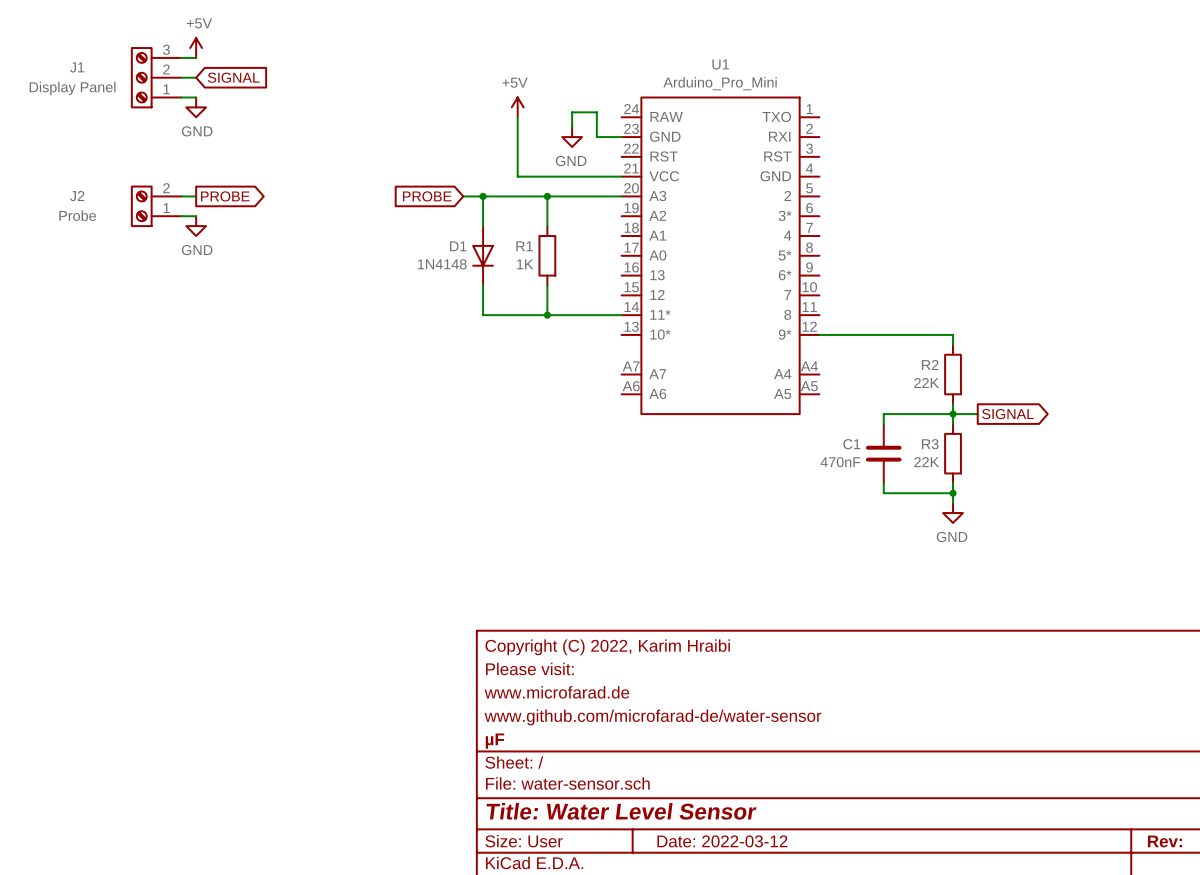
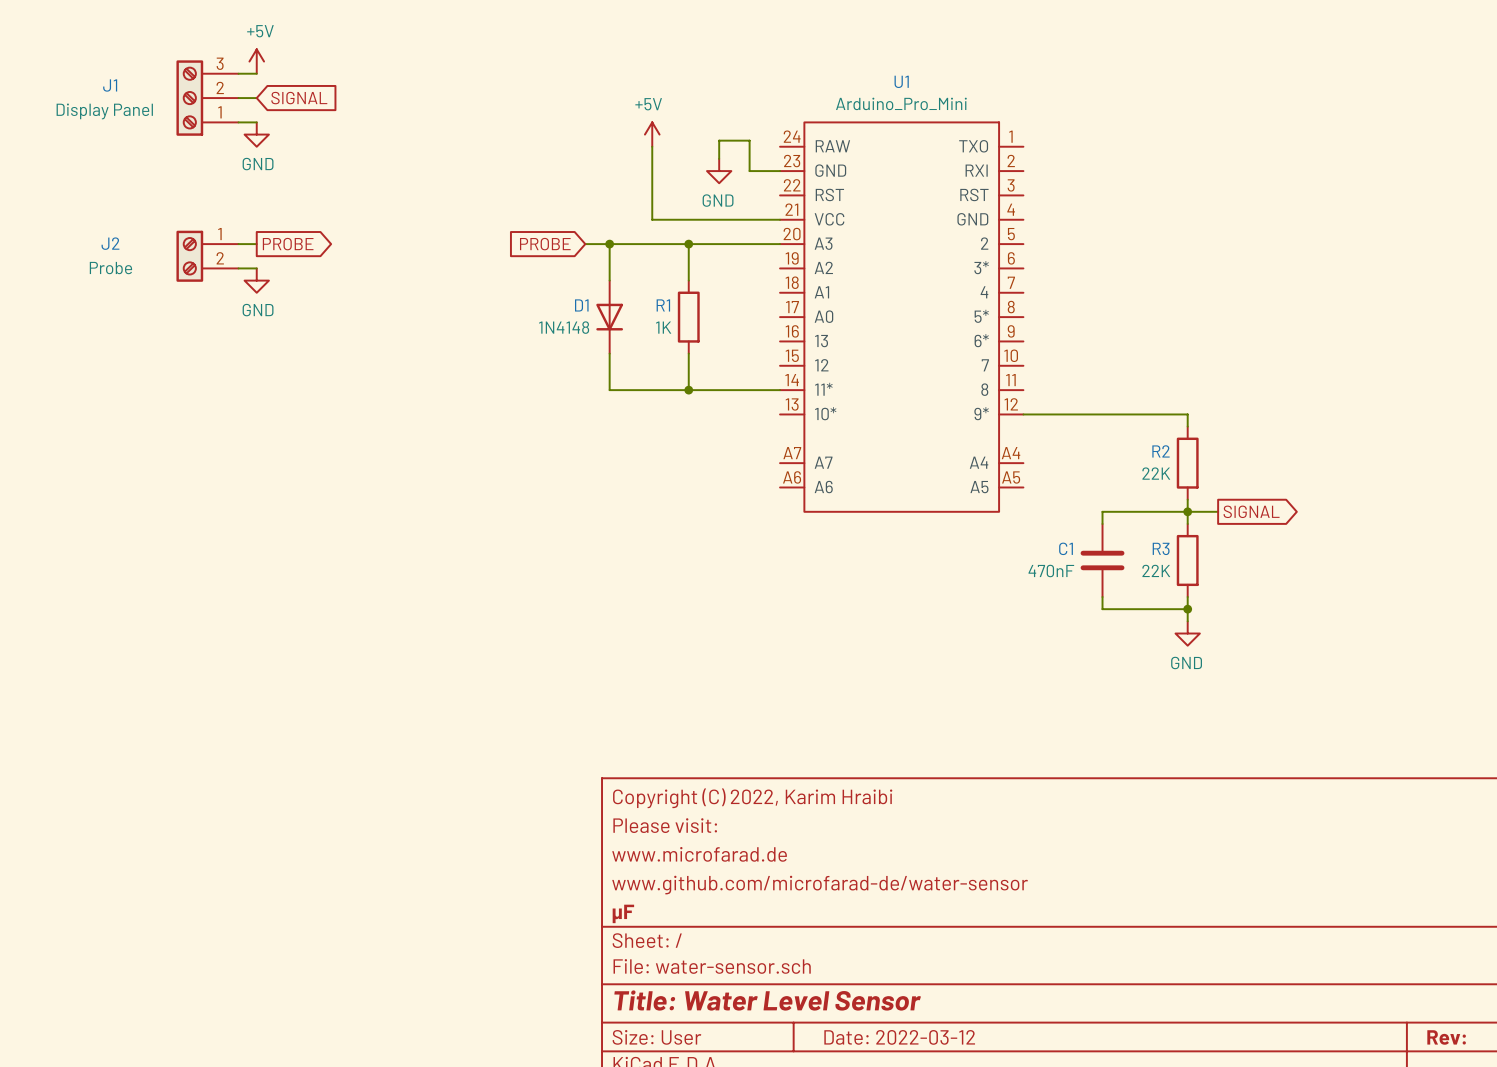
J2 flip: as is (141, 206) -> up-down (189, 256)

